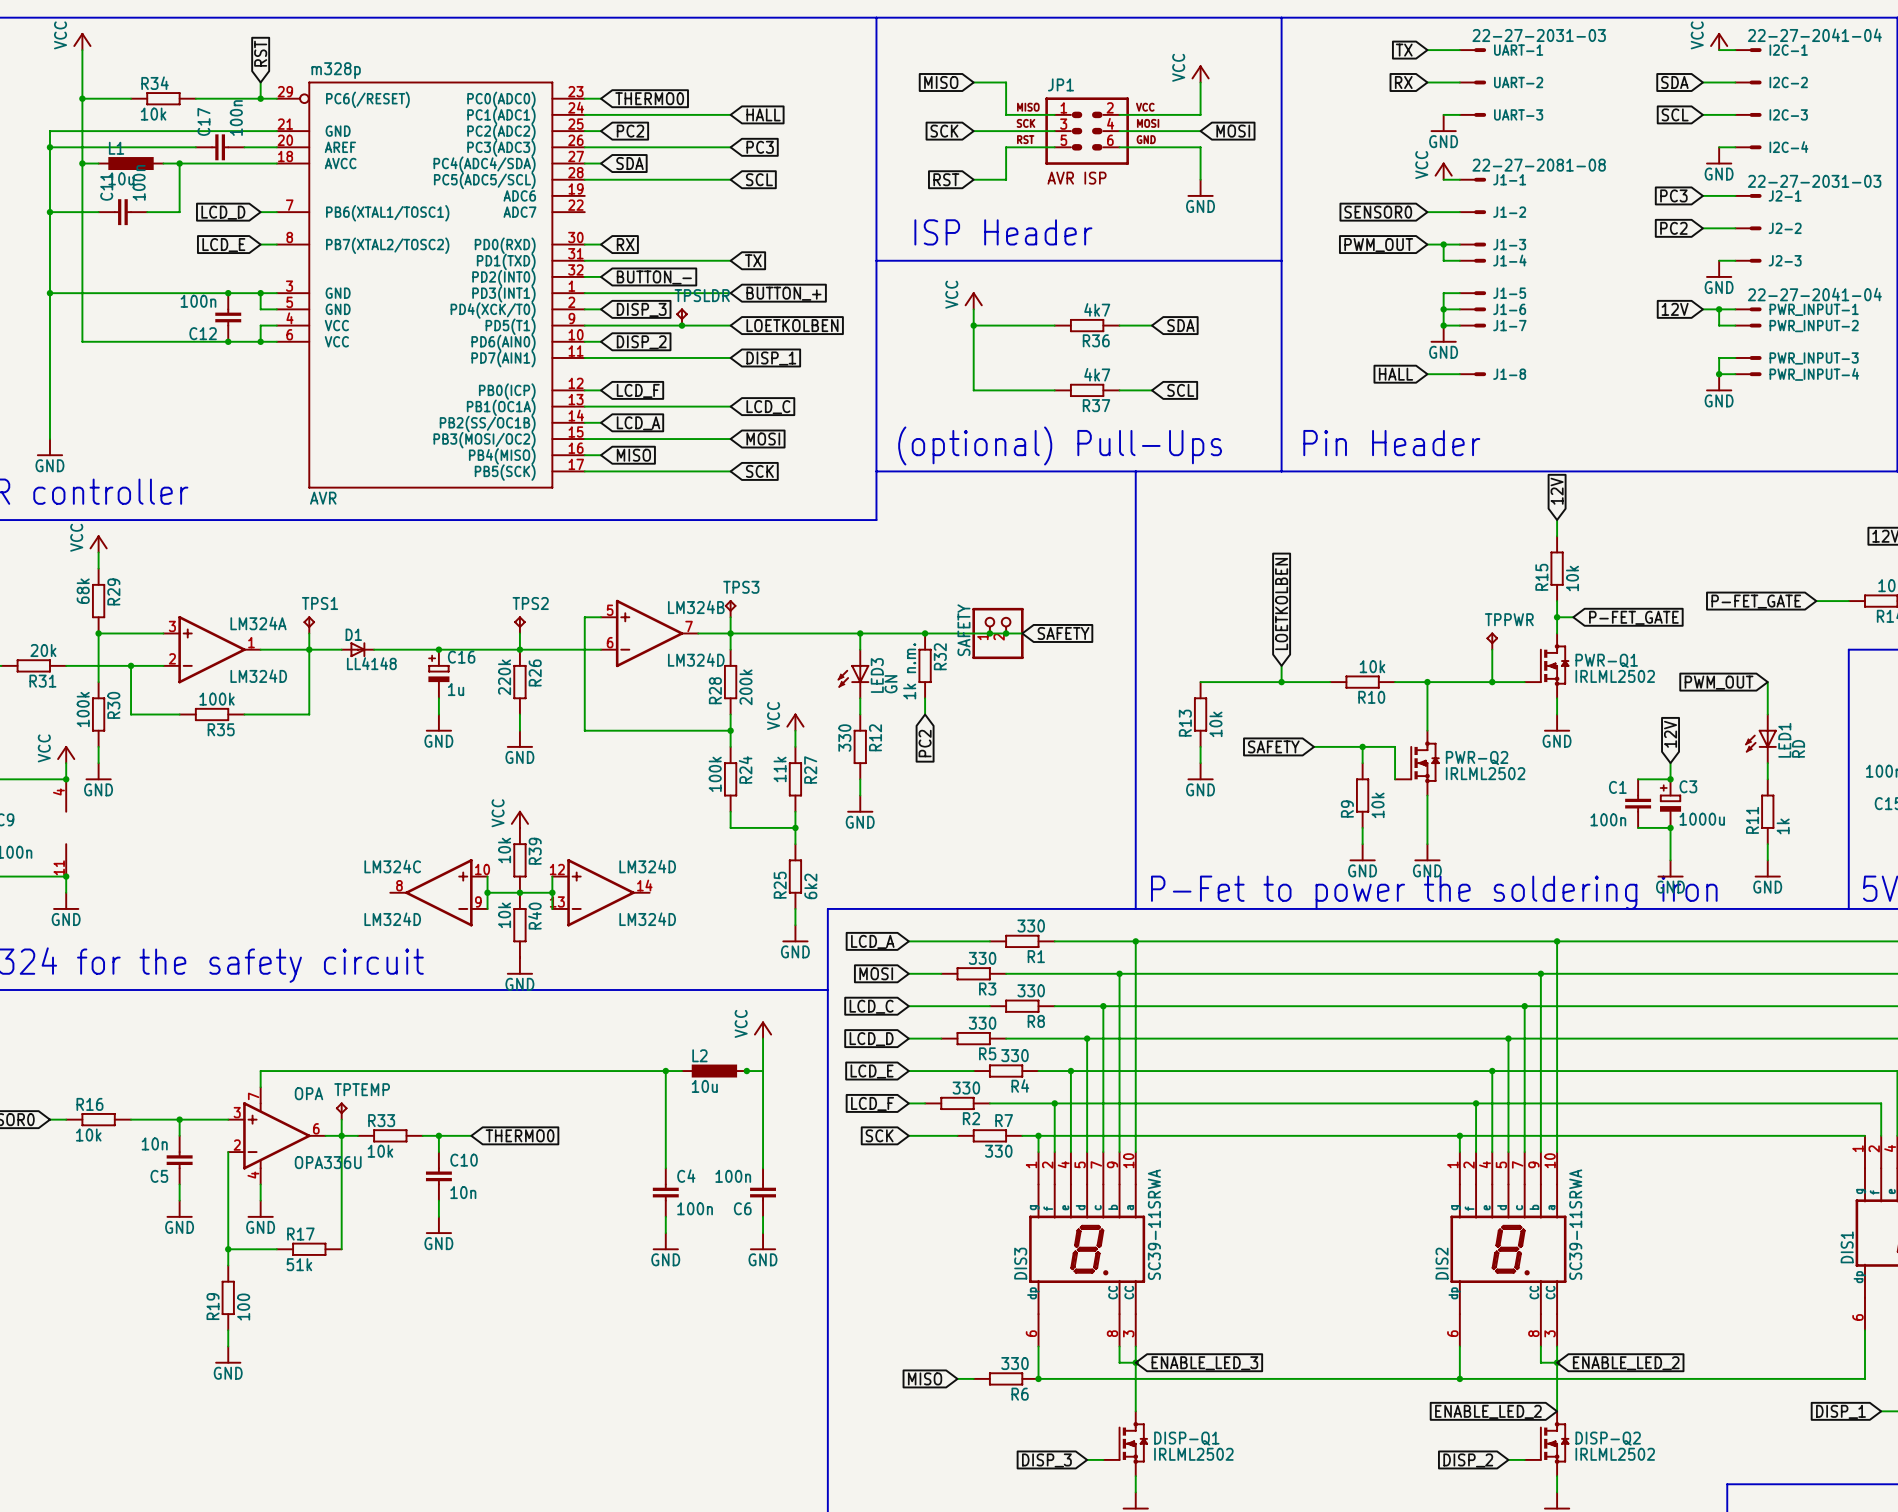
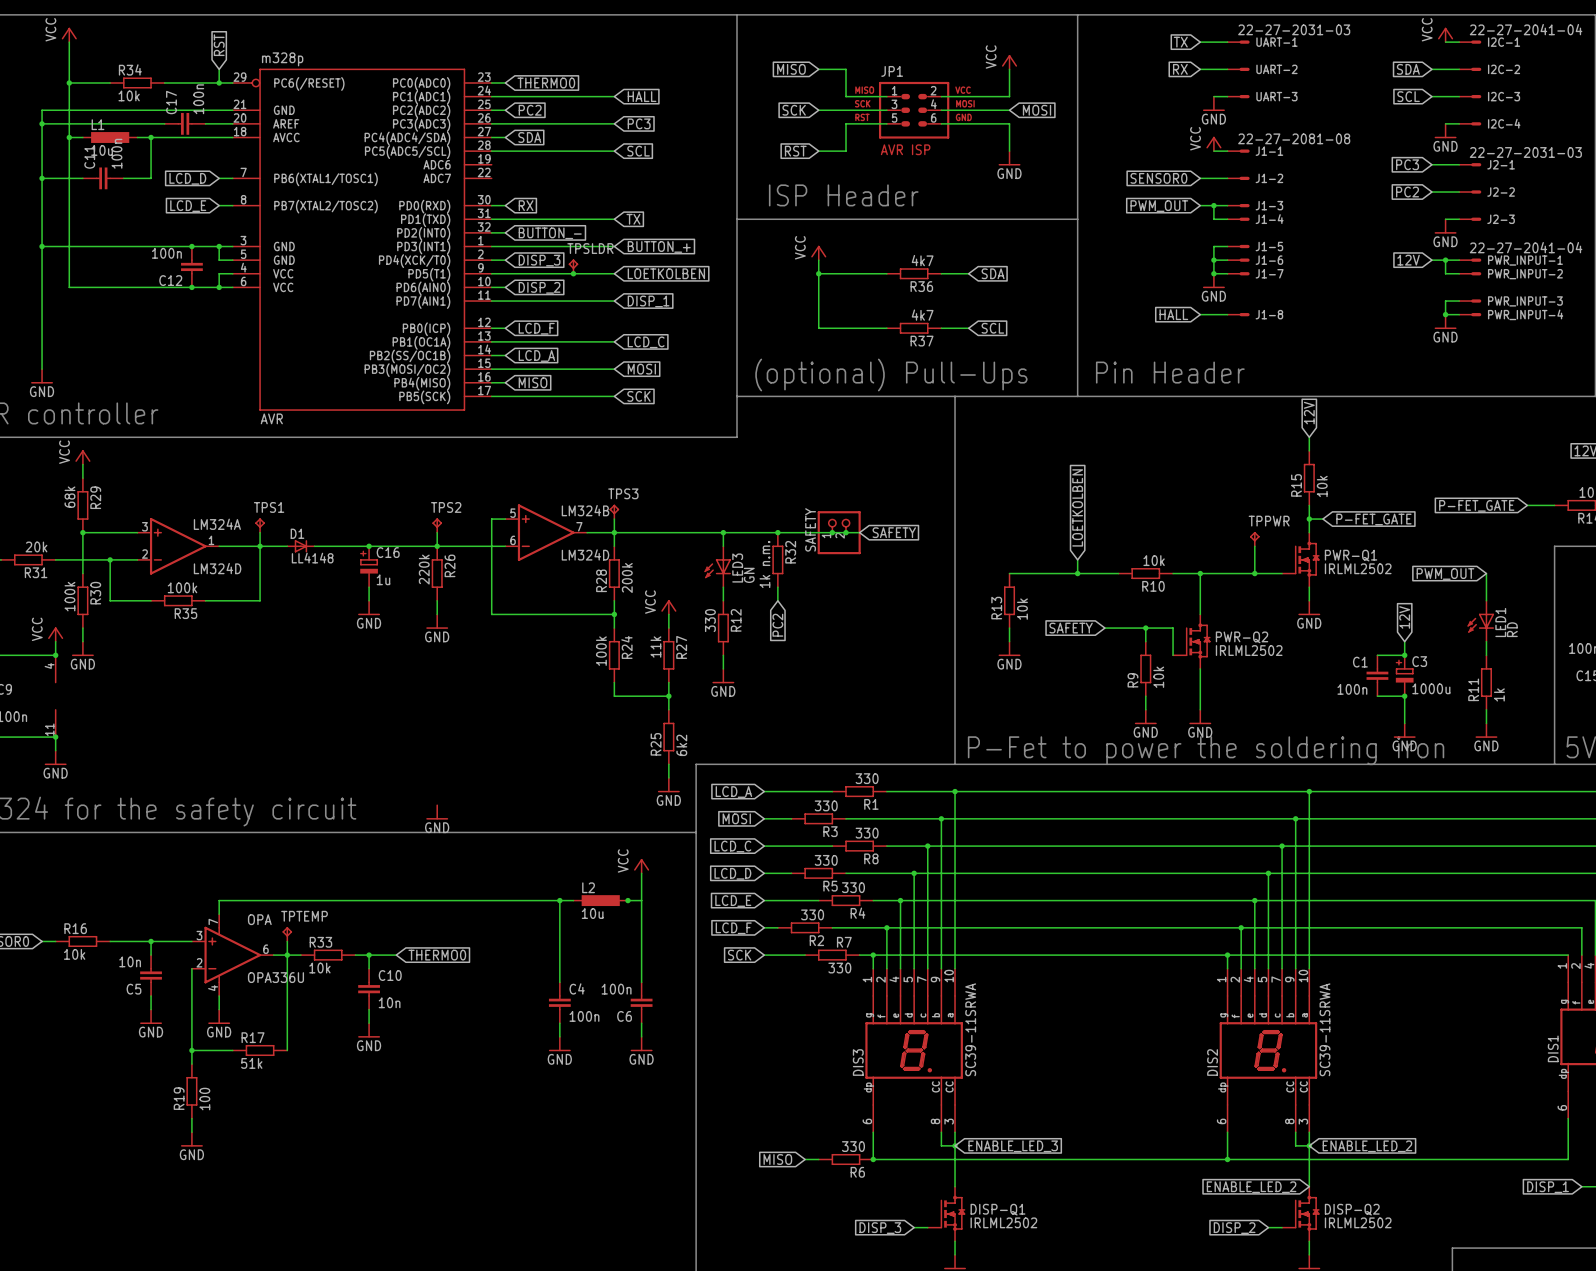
power symbol: VCC (519, 819) -> none
R39: 10k (519, 860) -> none
wire: (487, 876) (487, 908) -> none
wire: (552, 876) (552, 908) -> none
LM324C: LM324D (438, 892) -> none
wire: (487, 892) (552, 892) -> none
junction: (487, 892) -> none
junction: (519, 892) -> none
junction: (552, 892) -> none
LM324D: LM324D (600, 892) -> none
R40: 10k (519, 925) -> none

